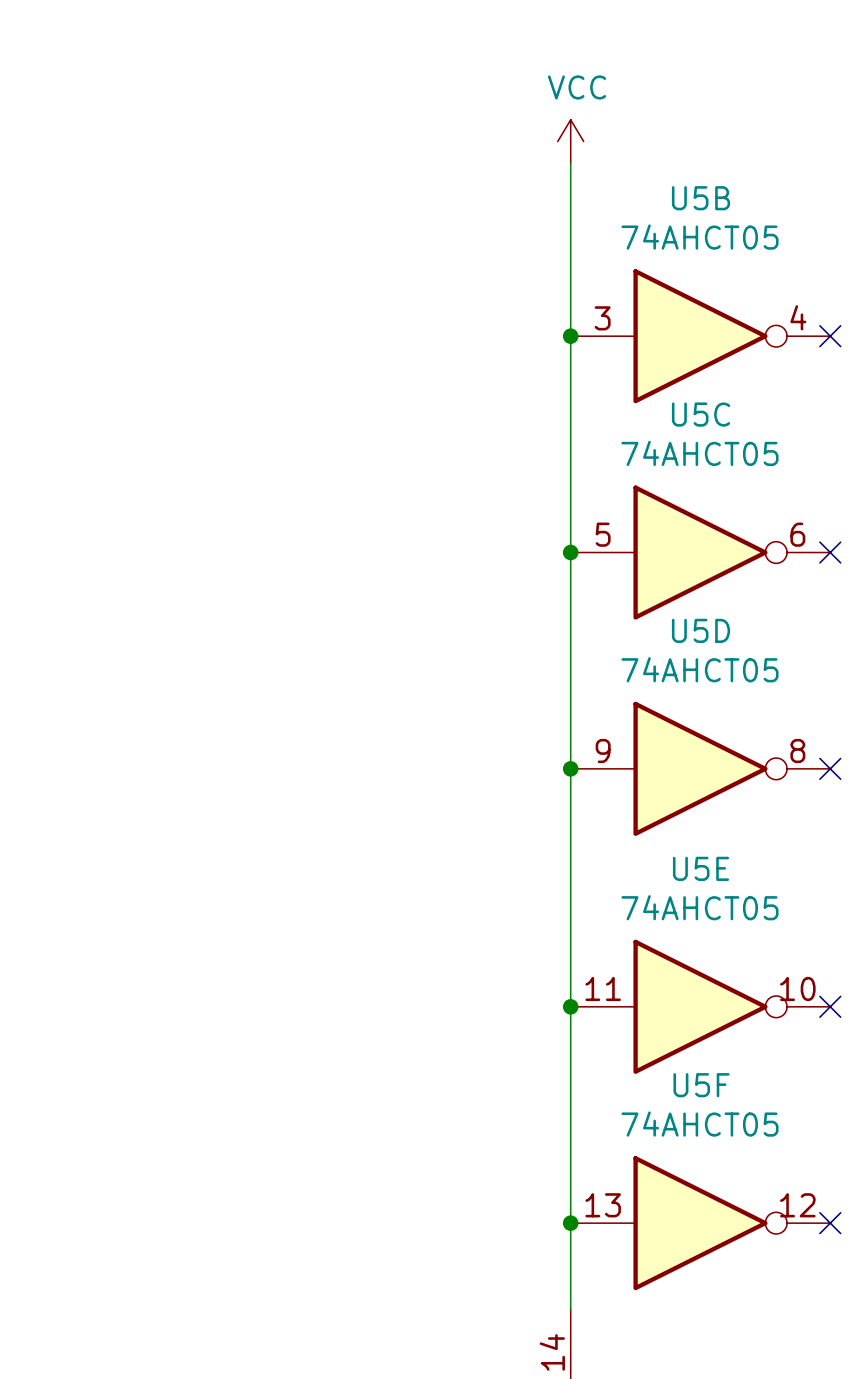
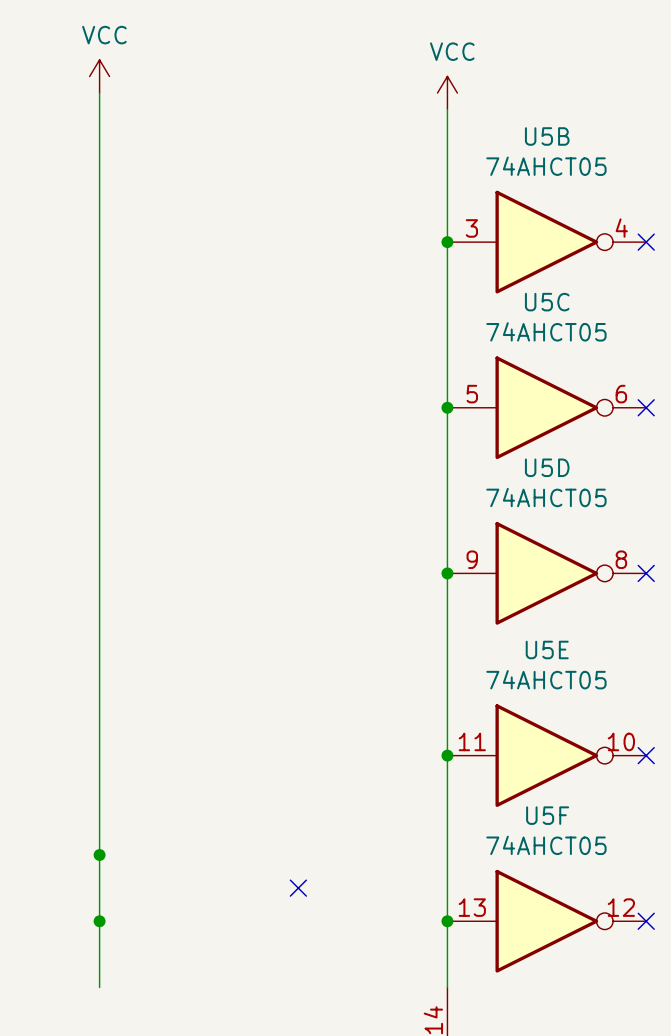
power symbol: none -> VCC (99, 76)
wire: none -> (99, 93) (99, 987)
junction: none -> (99, 855)
no-connect mark: none -> (298, 888)
junction: none -> (99, 921)

